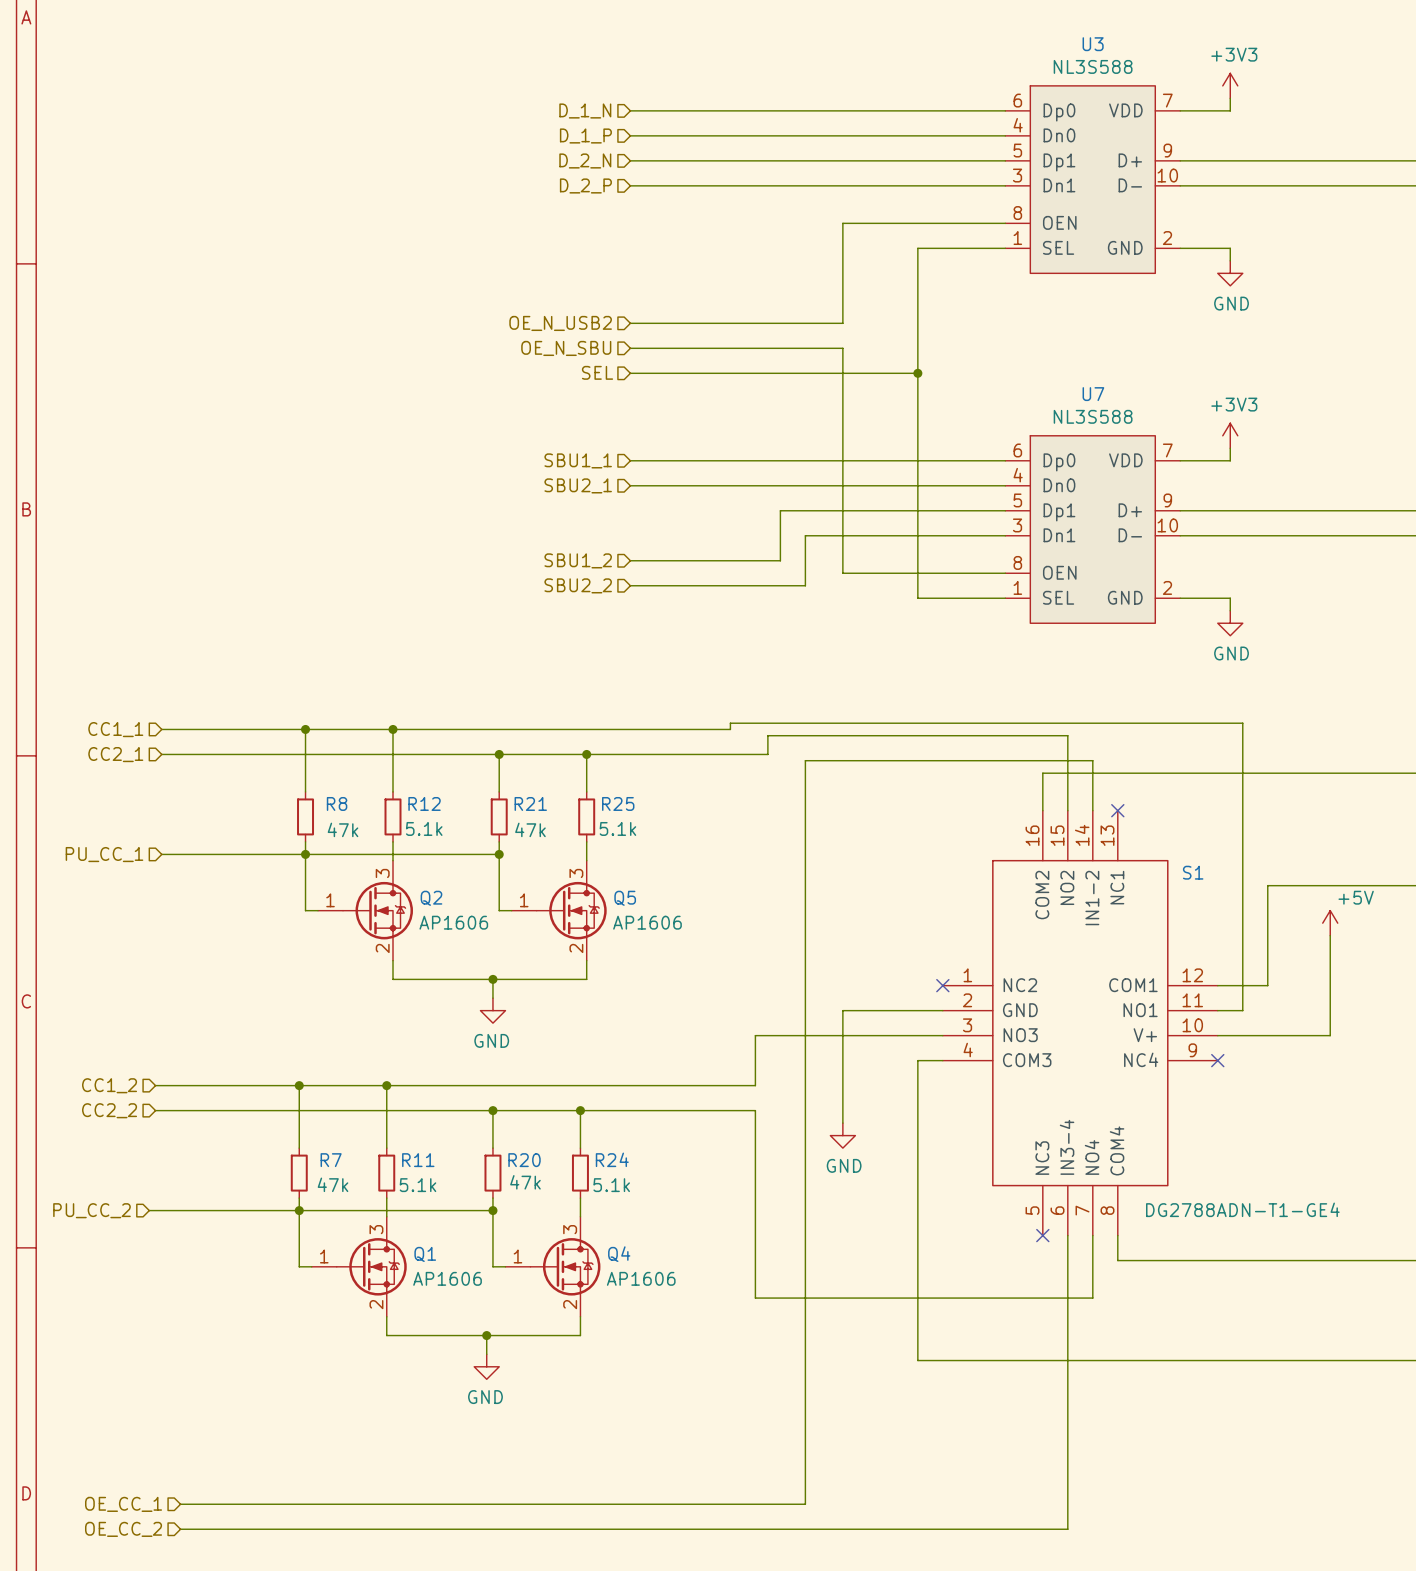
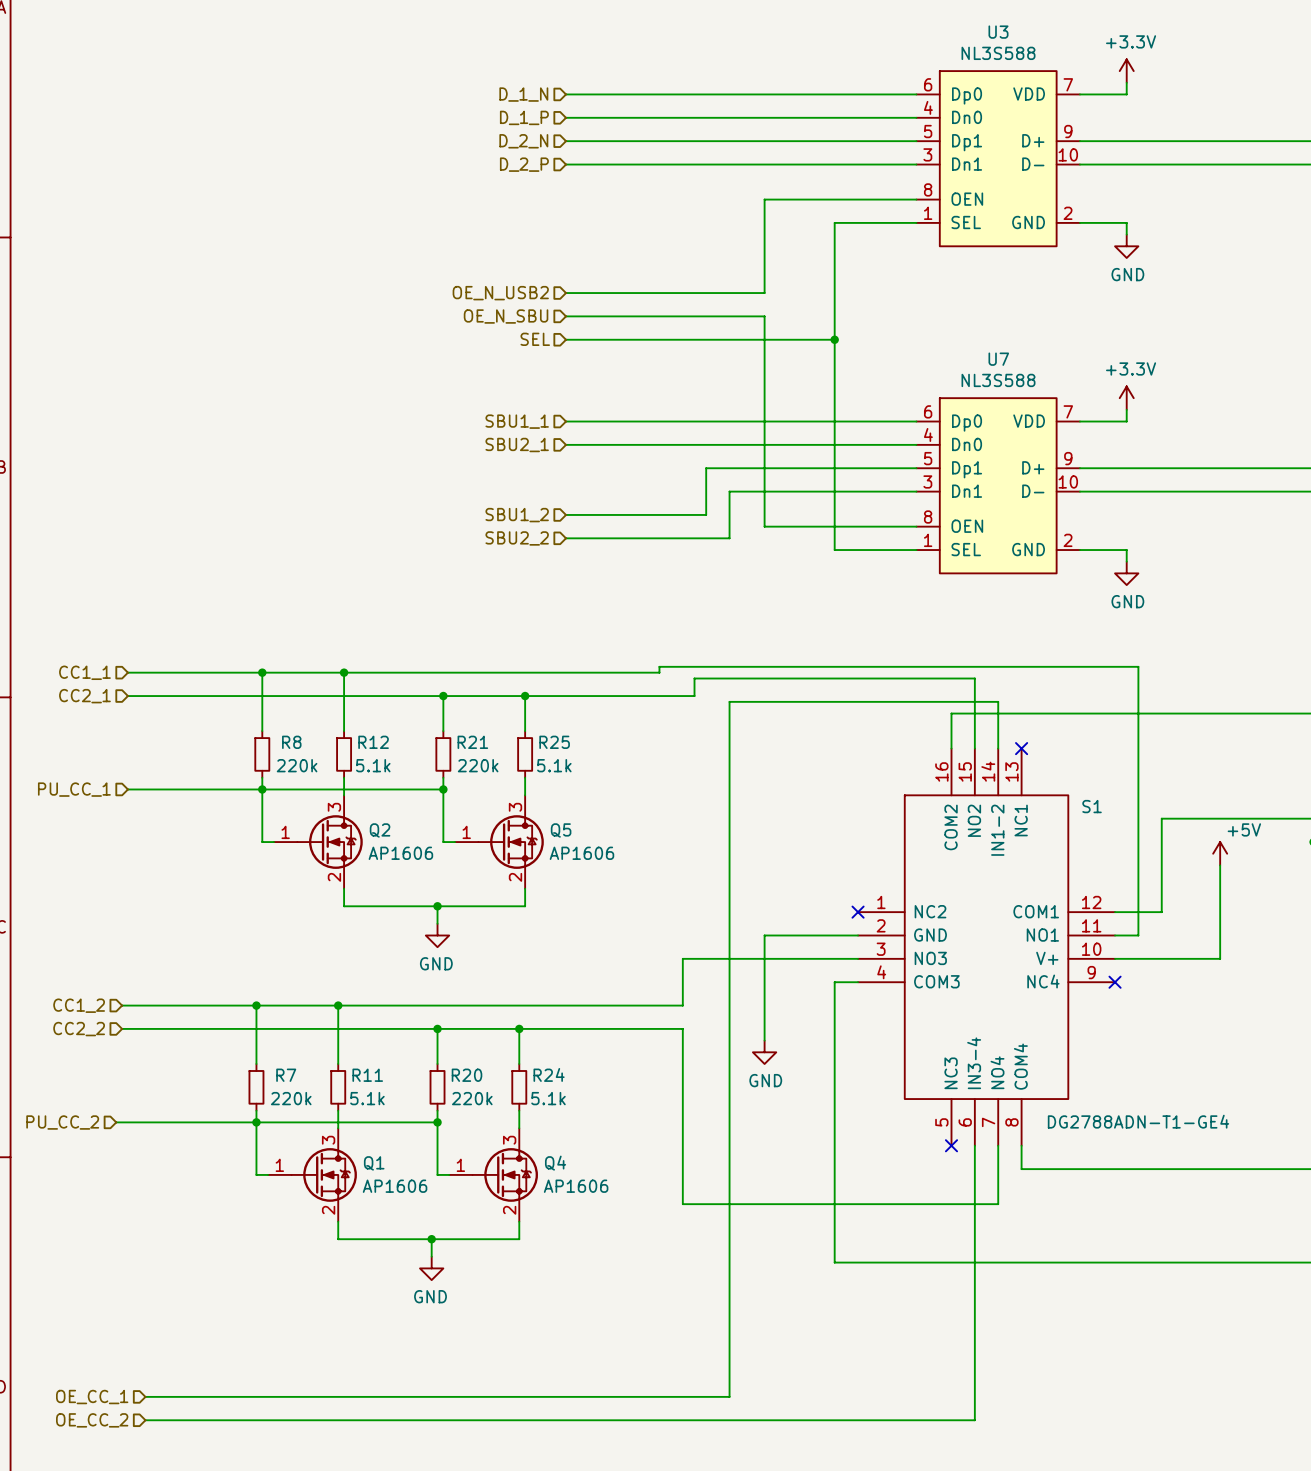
power symbol: +3V3 (1230, 85) -> +3.3V (1126, 71)
power symbol: +3V3 (1230, 435) -> +3.3V (1126, 398)
R8 value: 47k (343, 829) -> 220k (297, 765)
R21 value: 47k (530, 829) -> 220k (478, 765)
R20 value: 47k (525, 1182) -> 220k (472, 1098)
R7 value: 47k (333, 1184) -> 220k (291, 1098)

